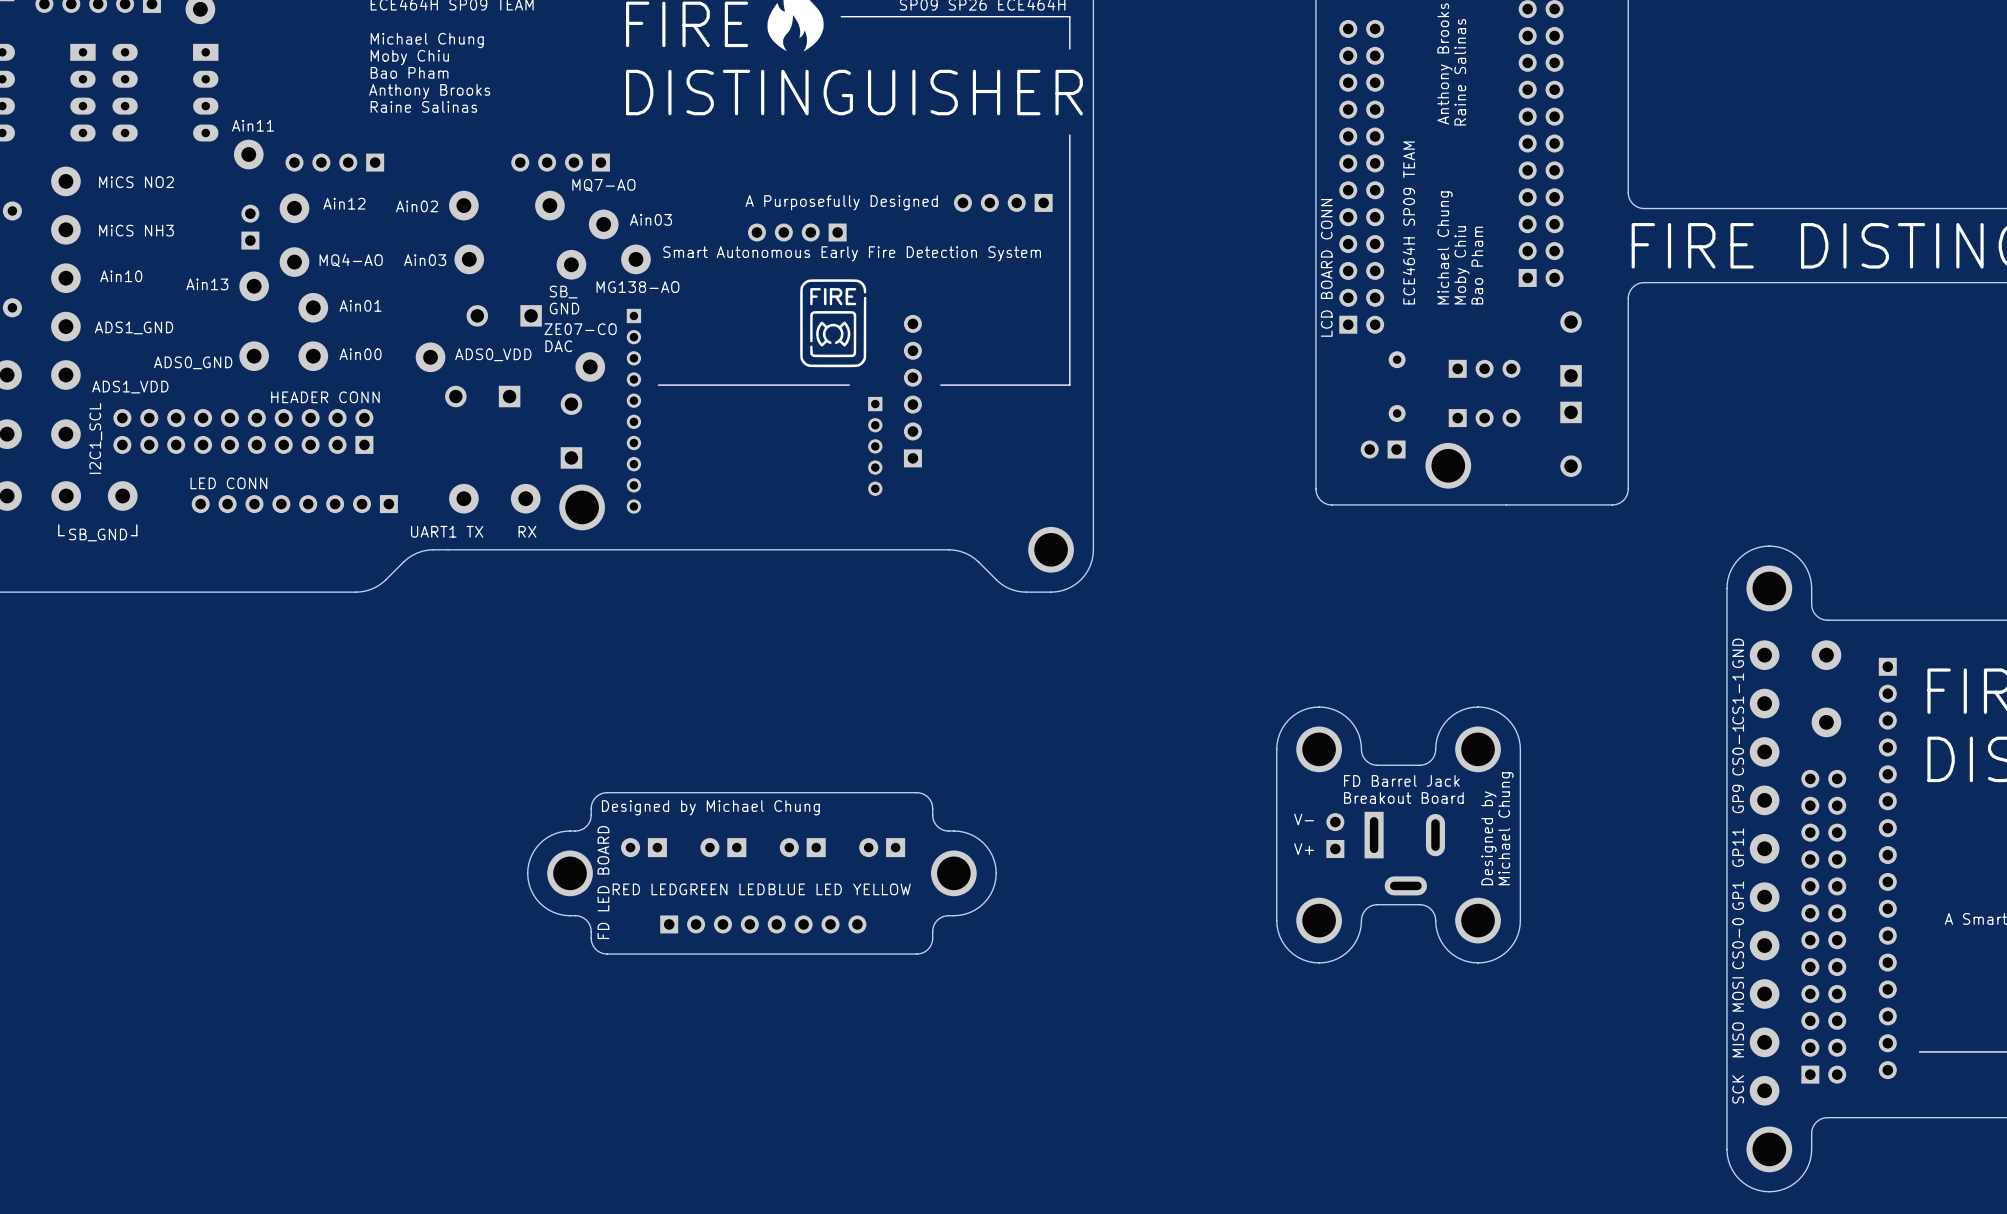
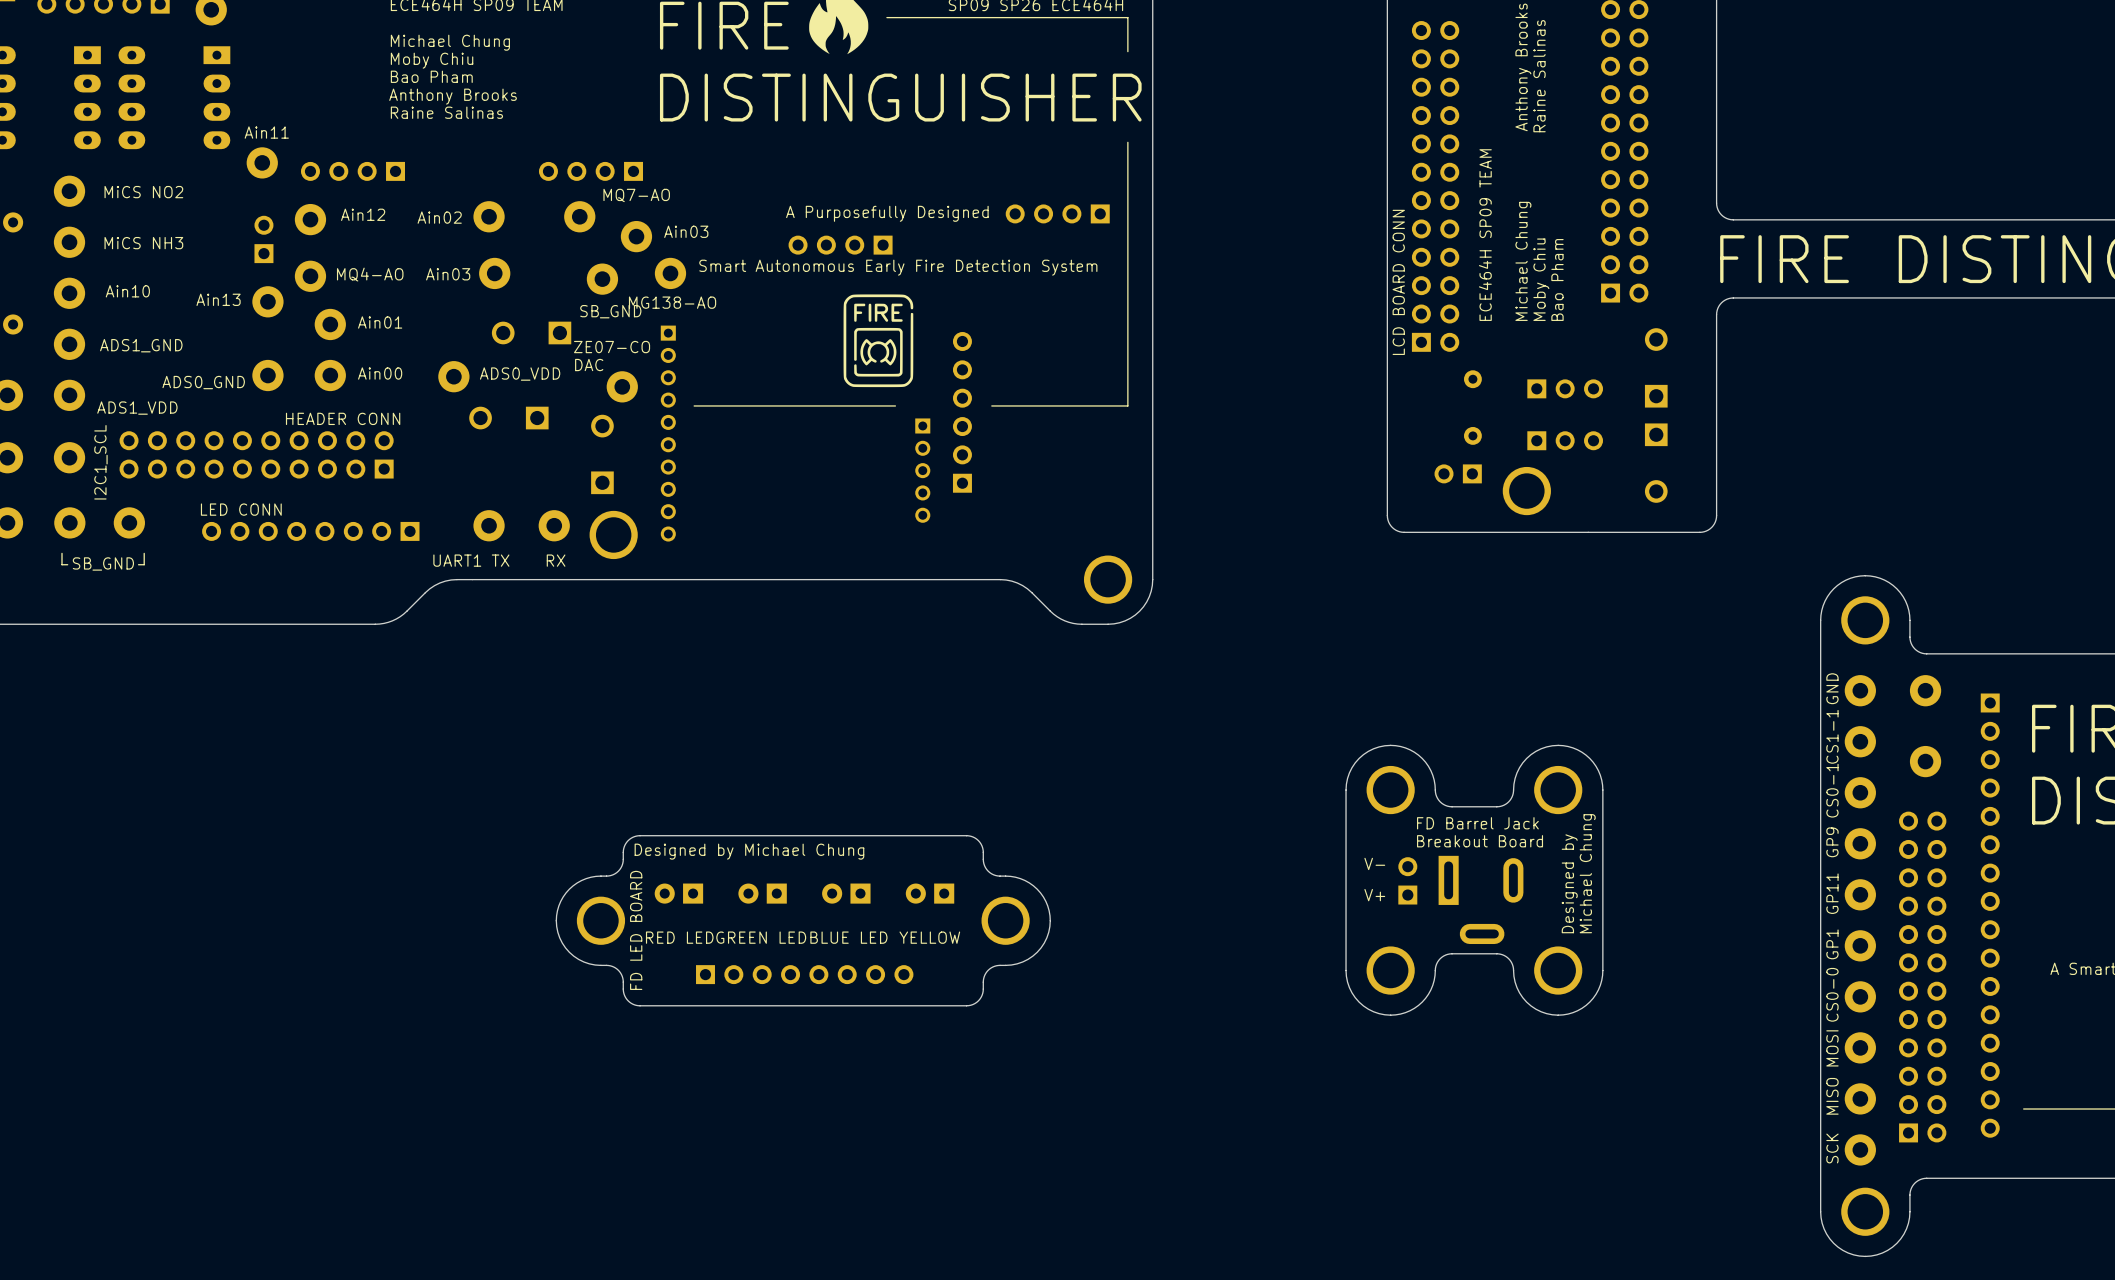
text: SB_ (563, 292) -> SB_GND (610, 311)
text: GND (564, 308) -> none

